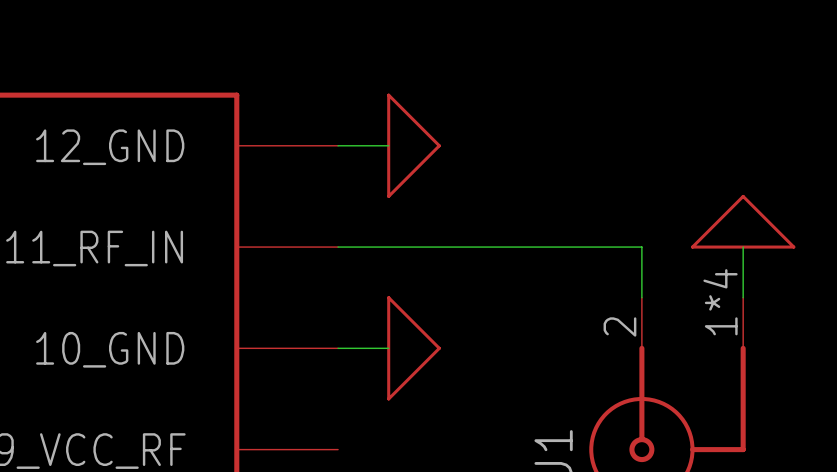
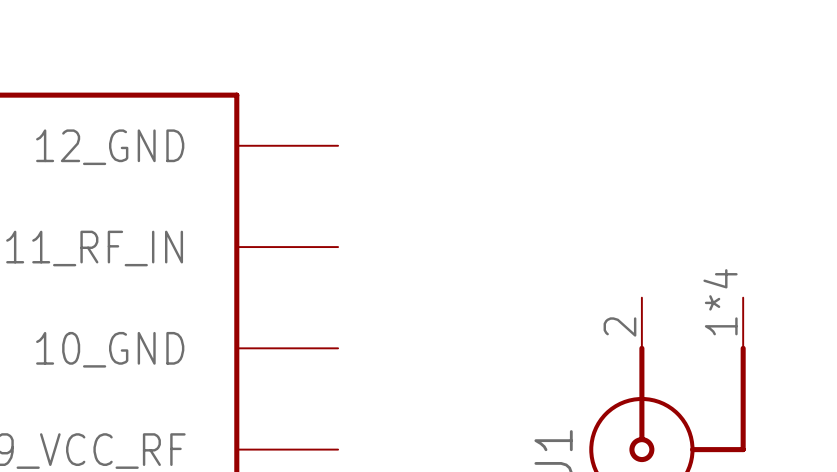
wire: (338, 145) (388, 145) -> none
power symbol: (414, 145) -> none
power symbol: (743, 221) -> none
wire: (338, 247) (641, 247) (641, 297) -> none
wire: (743, 247) (743, 297) -> none
wire: (338, 348) (388, 348) -> none
power symbol: (414, 348) -> none

